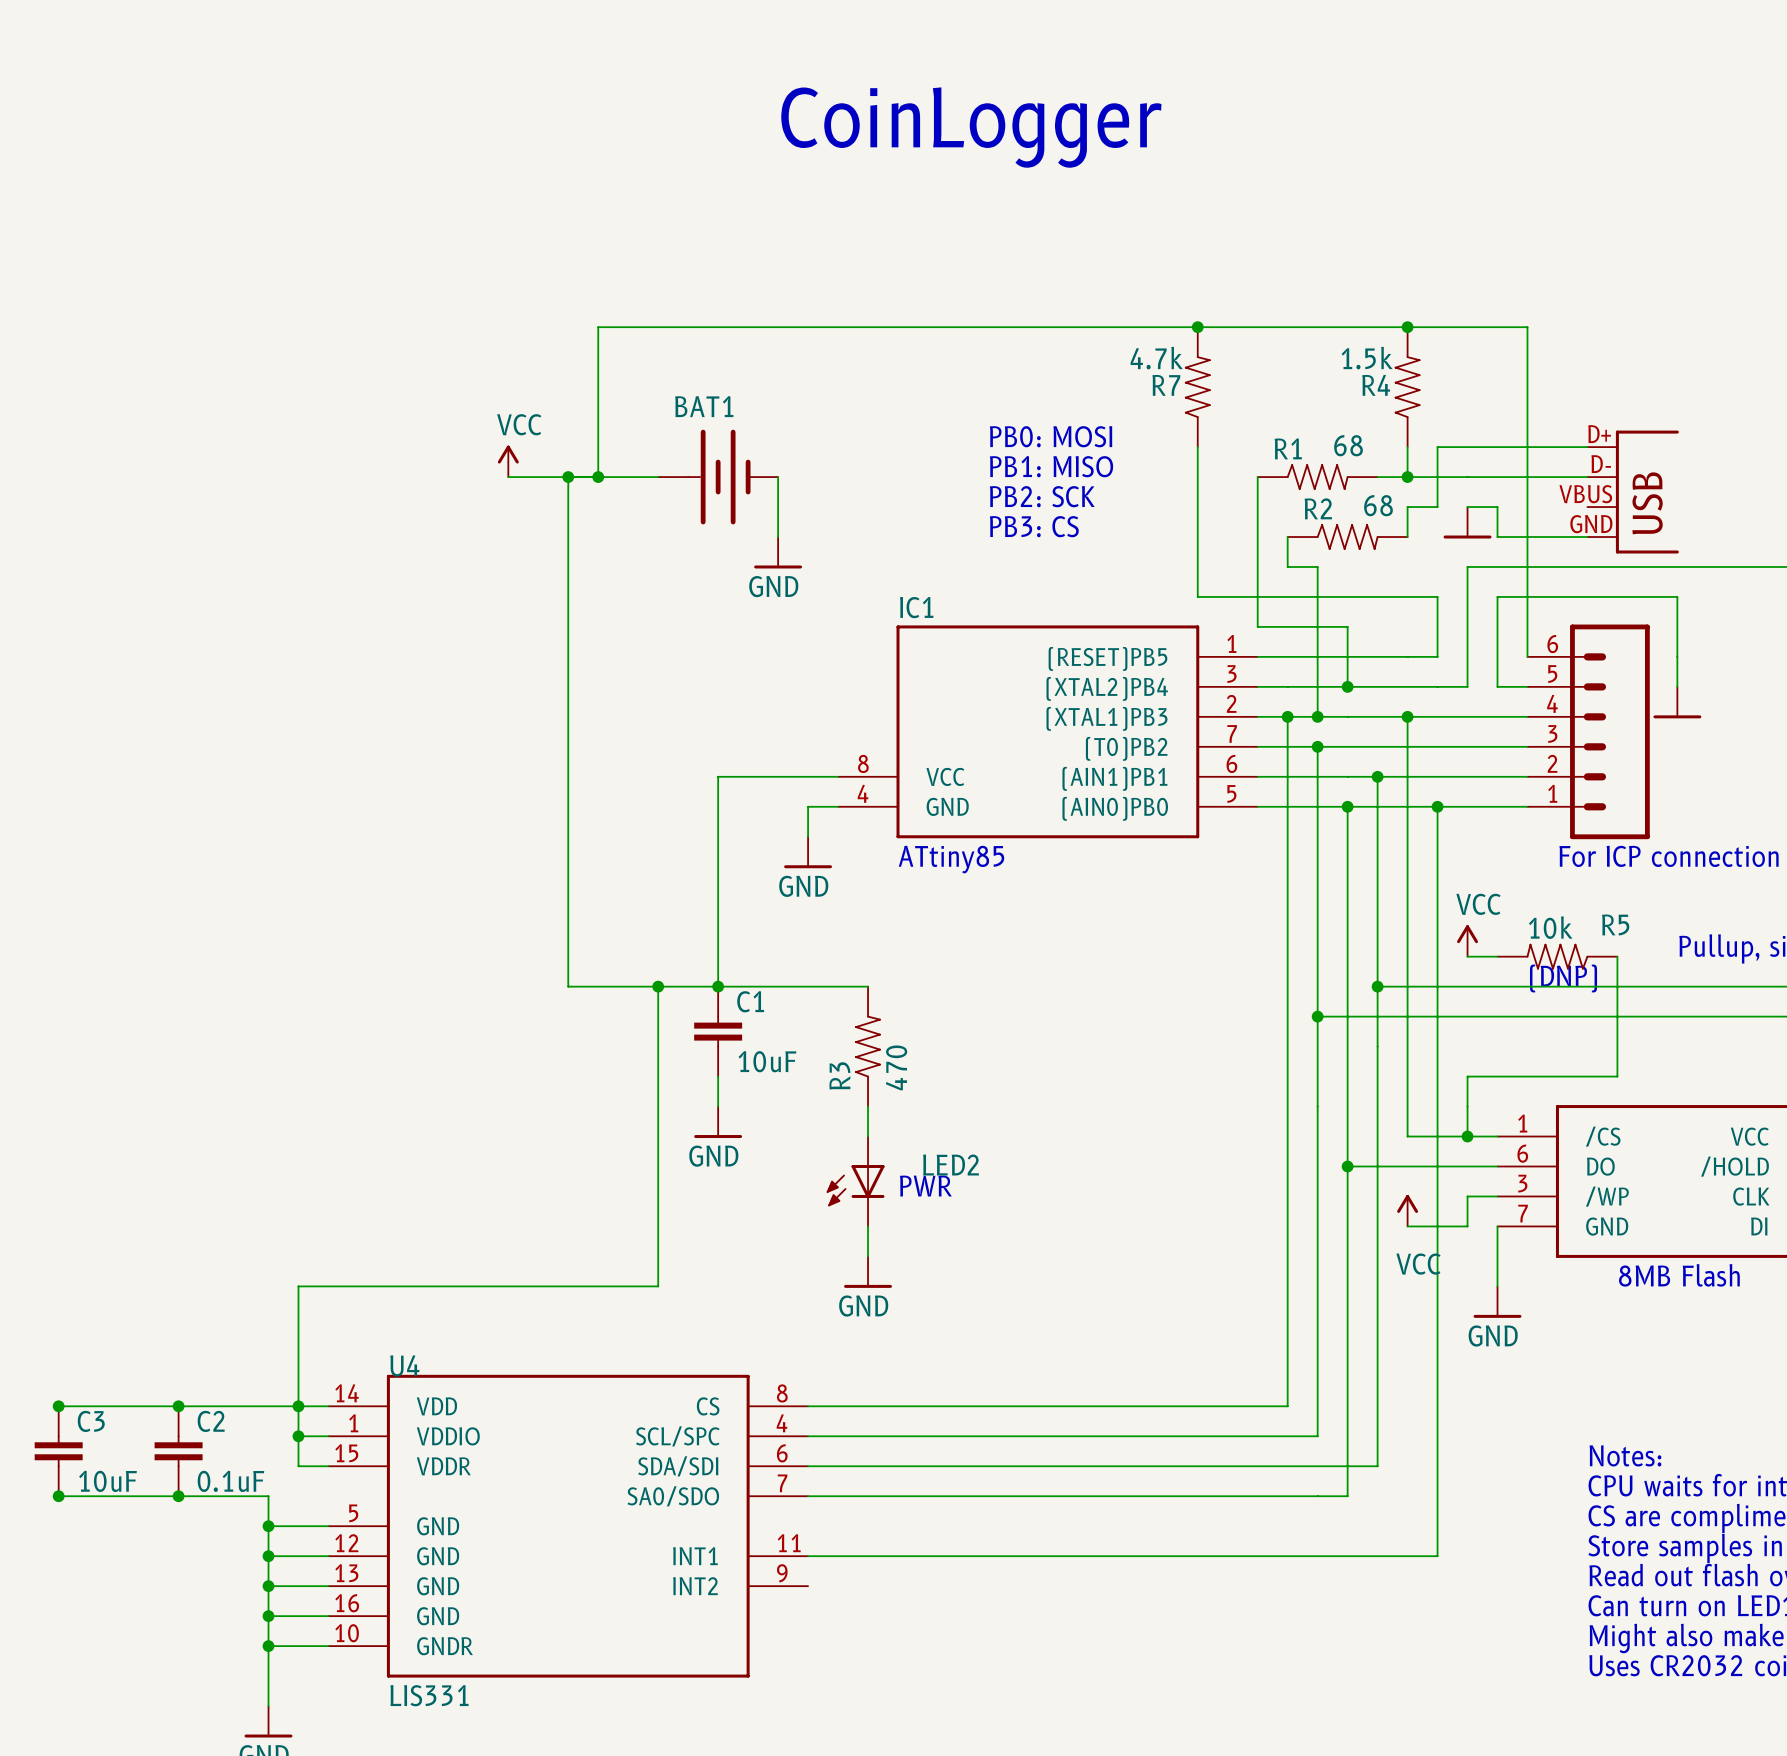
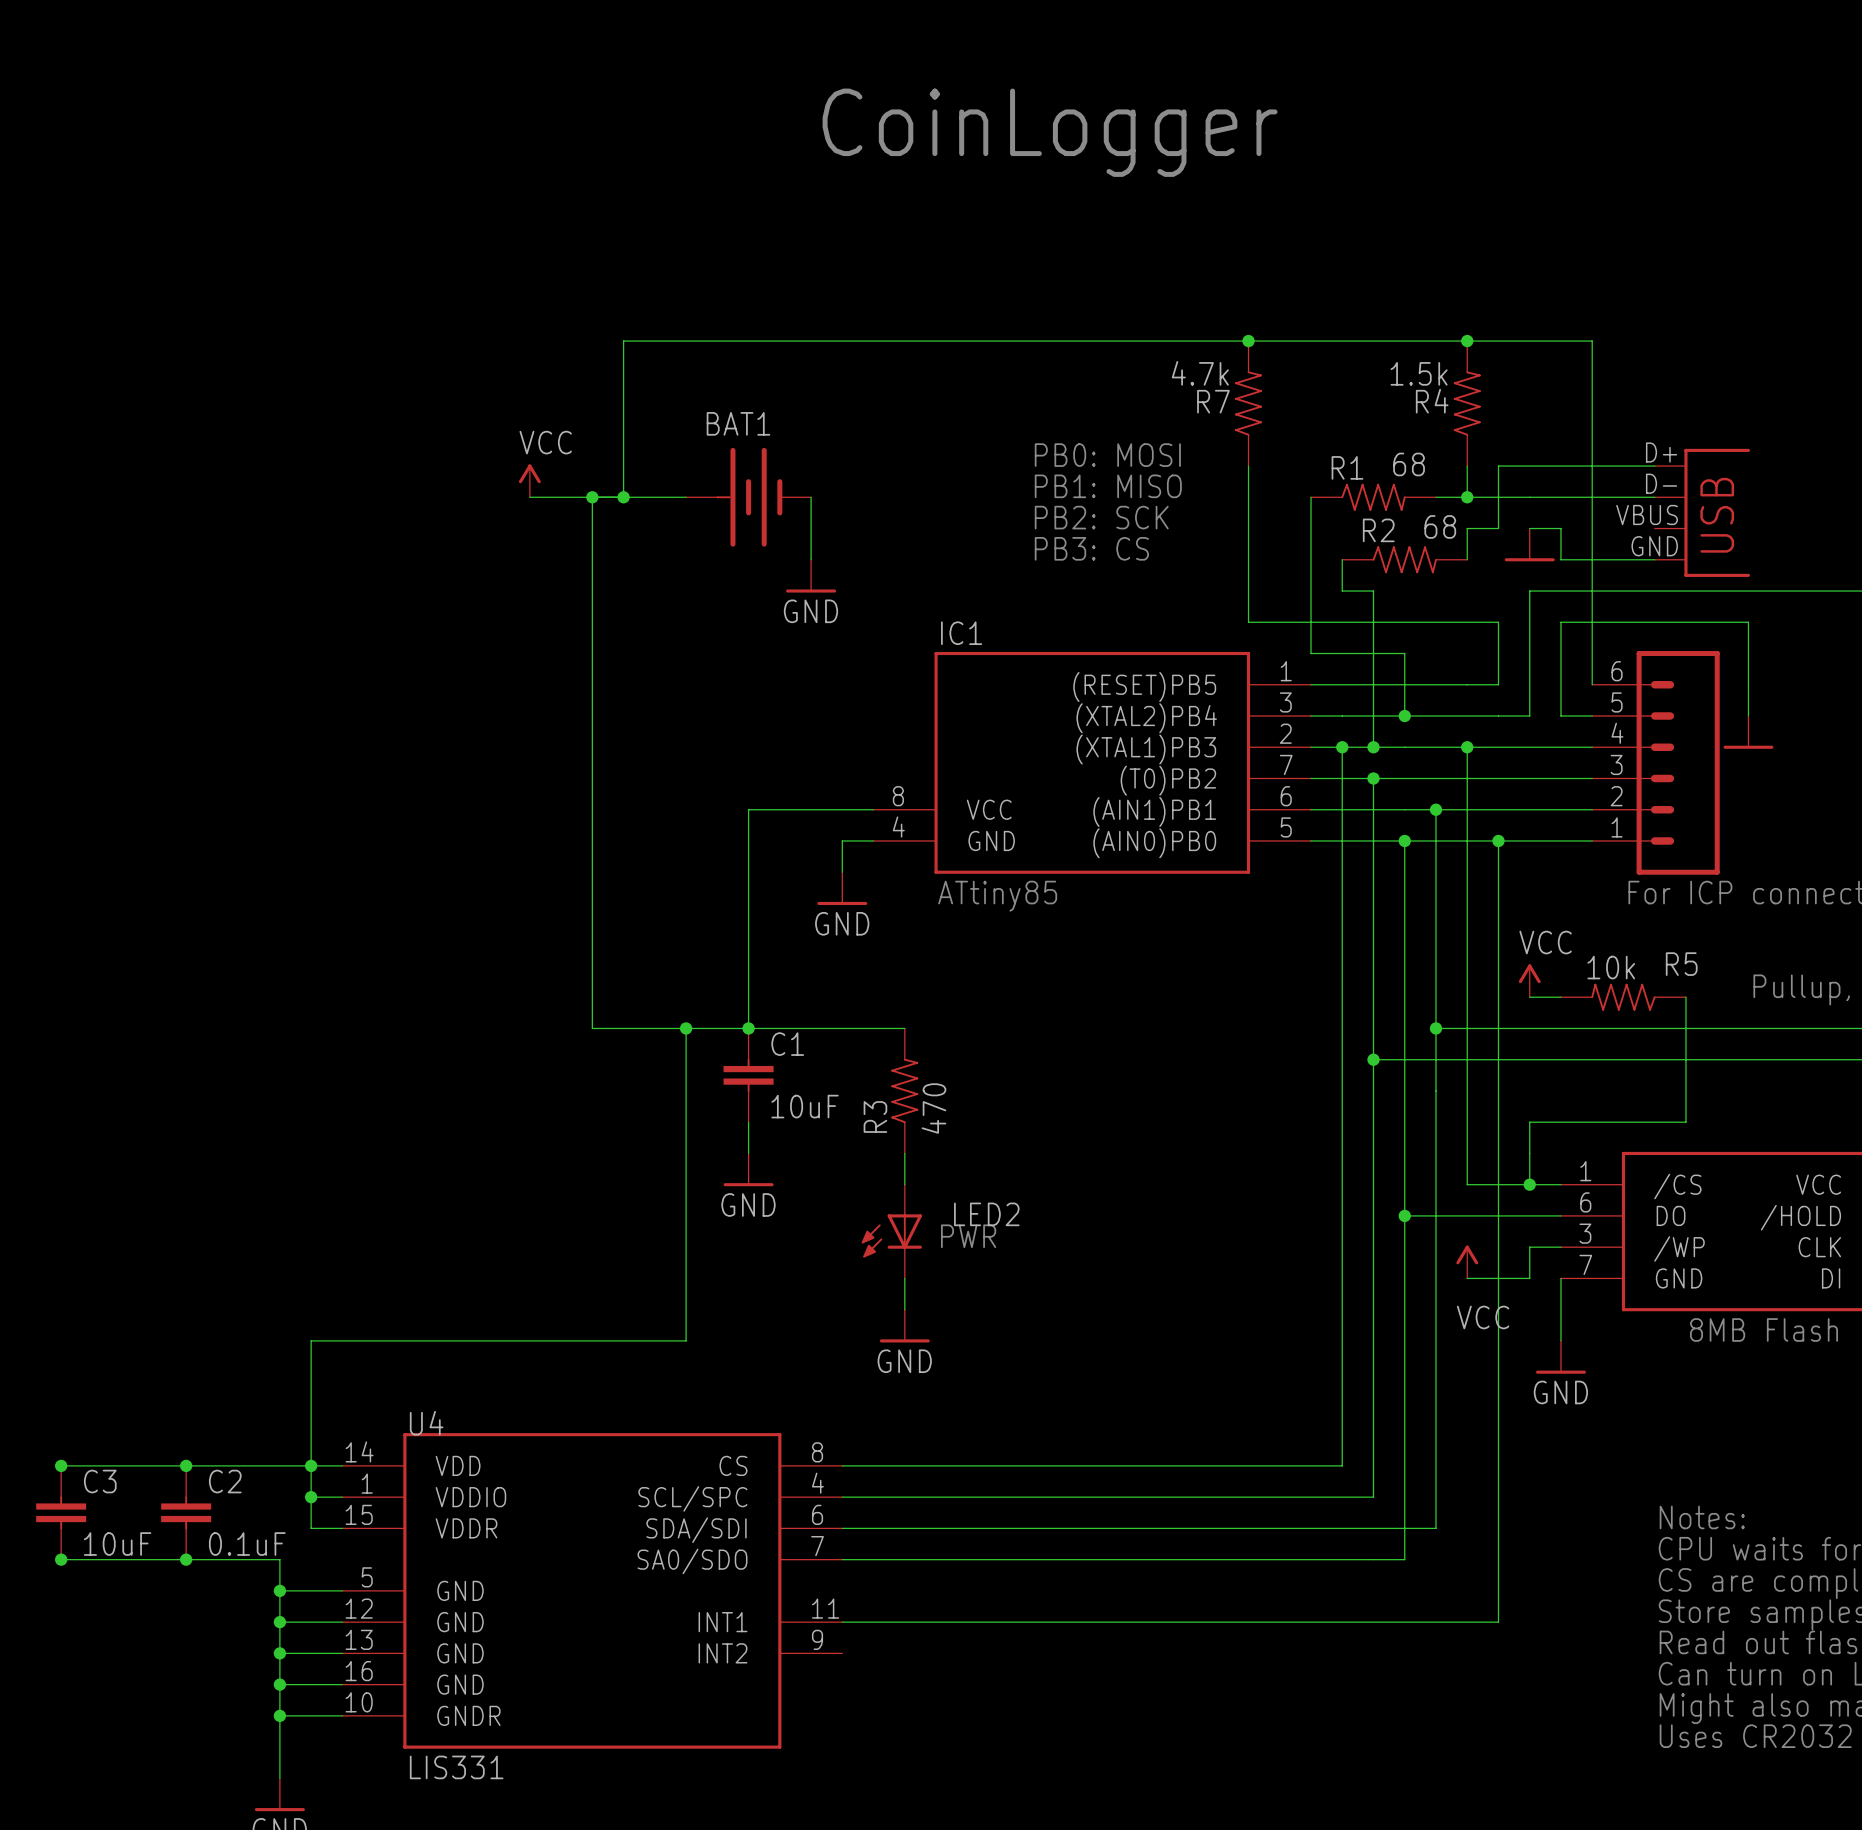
text: (DNP) (1563, 978) -> none

